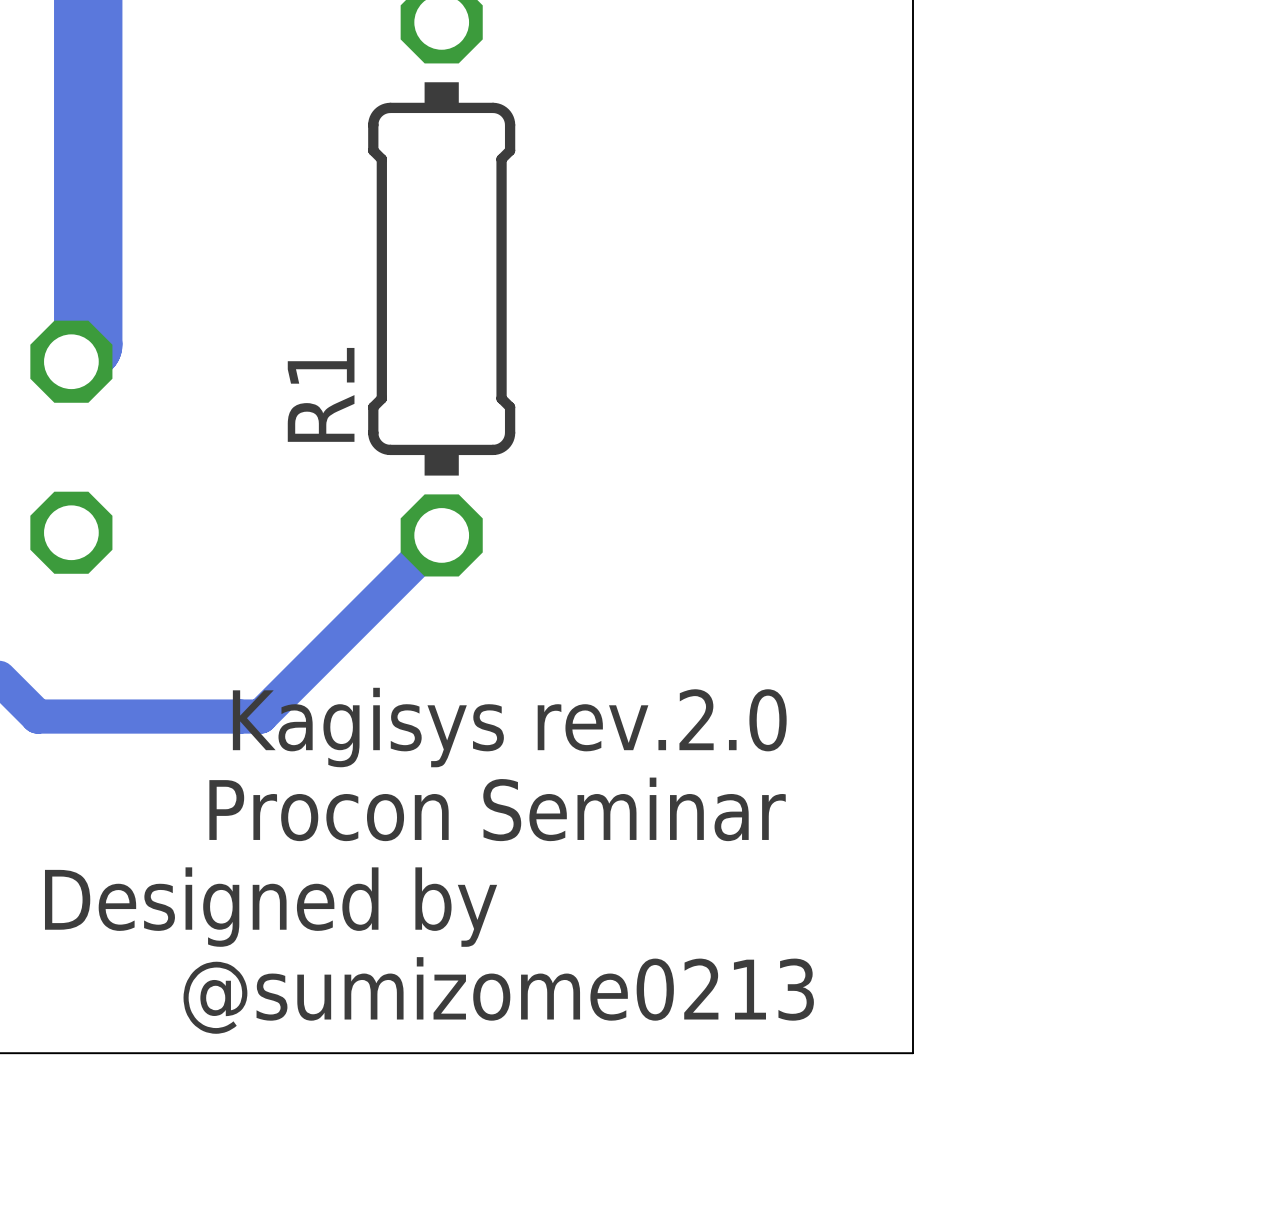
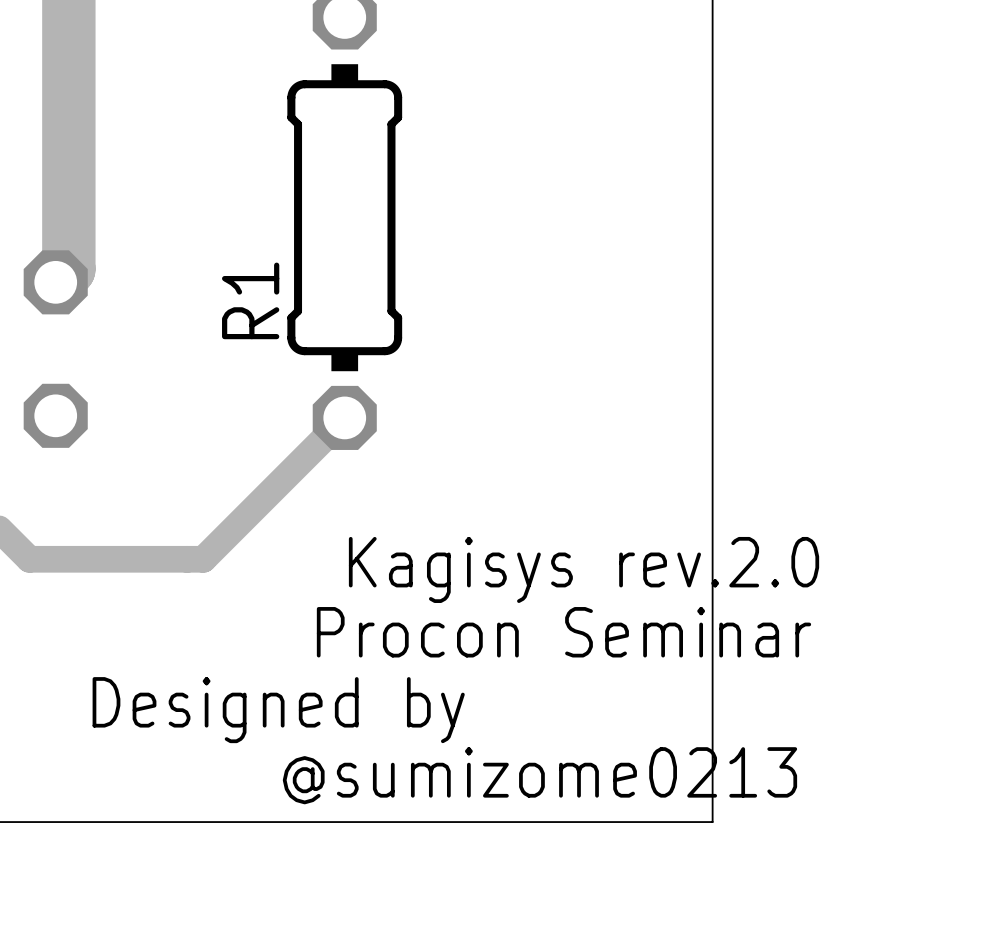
text position: Kagisys rev.2.0 (509, 727) -> Kagisys rev.2.0 (584, 569)
text position: Procon Seminar (497, 809) -> Procon Seminar (563, 632)
text position: Designed by (271, 907) -> Designed by (278, 710)
text position: @sumizome0213 (498, 995) -> @sumizome0213 (539, 775)

